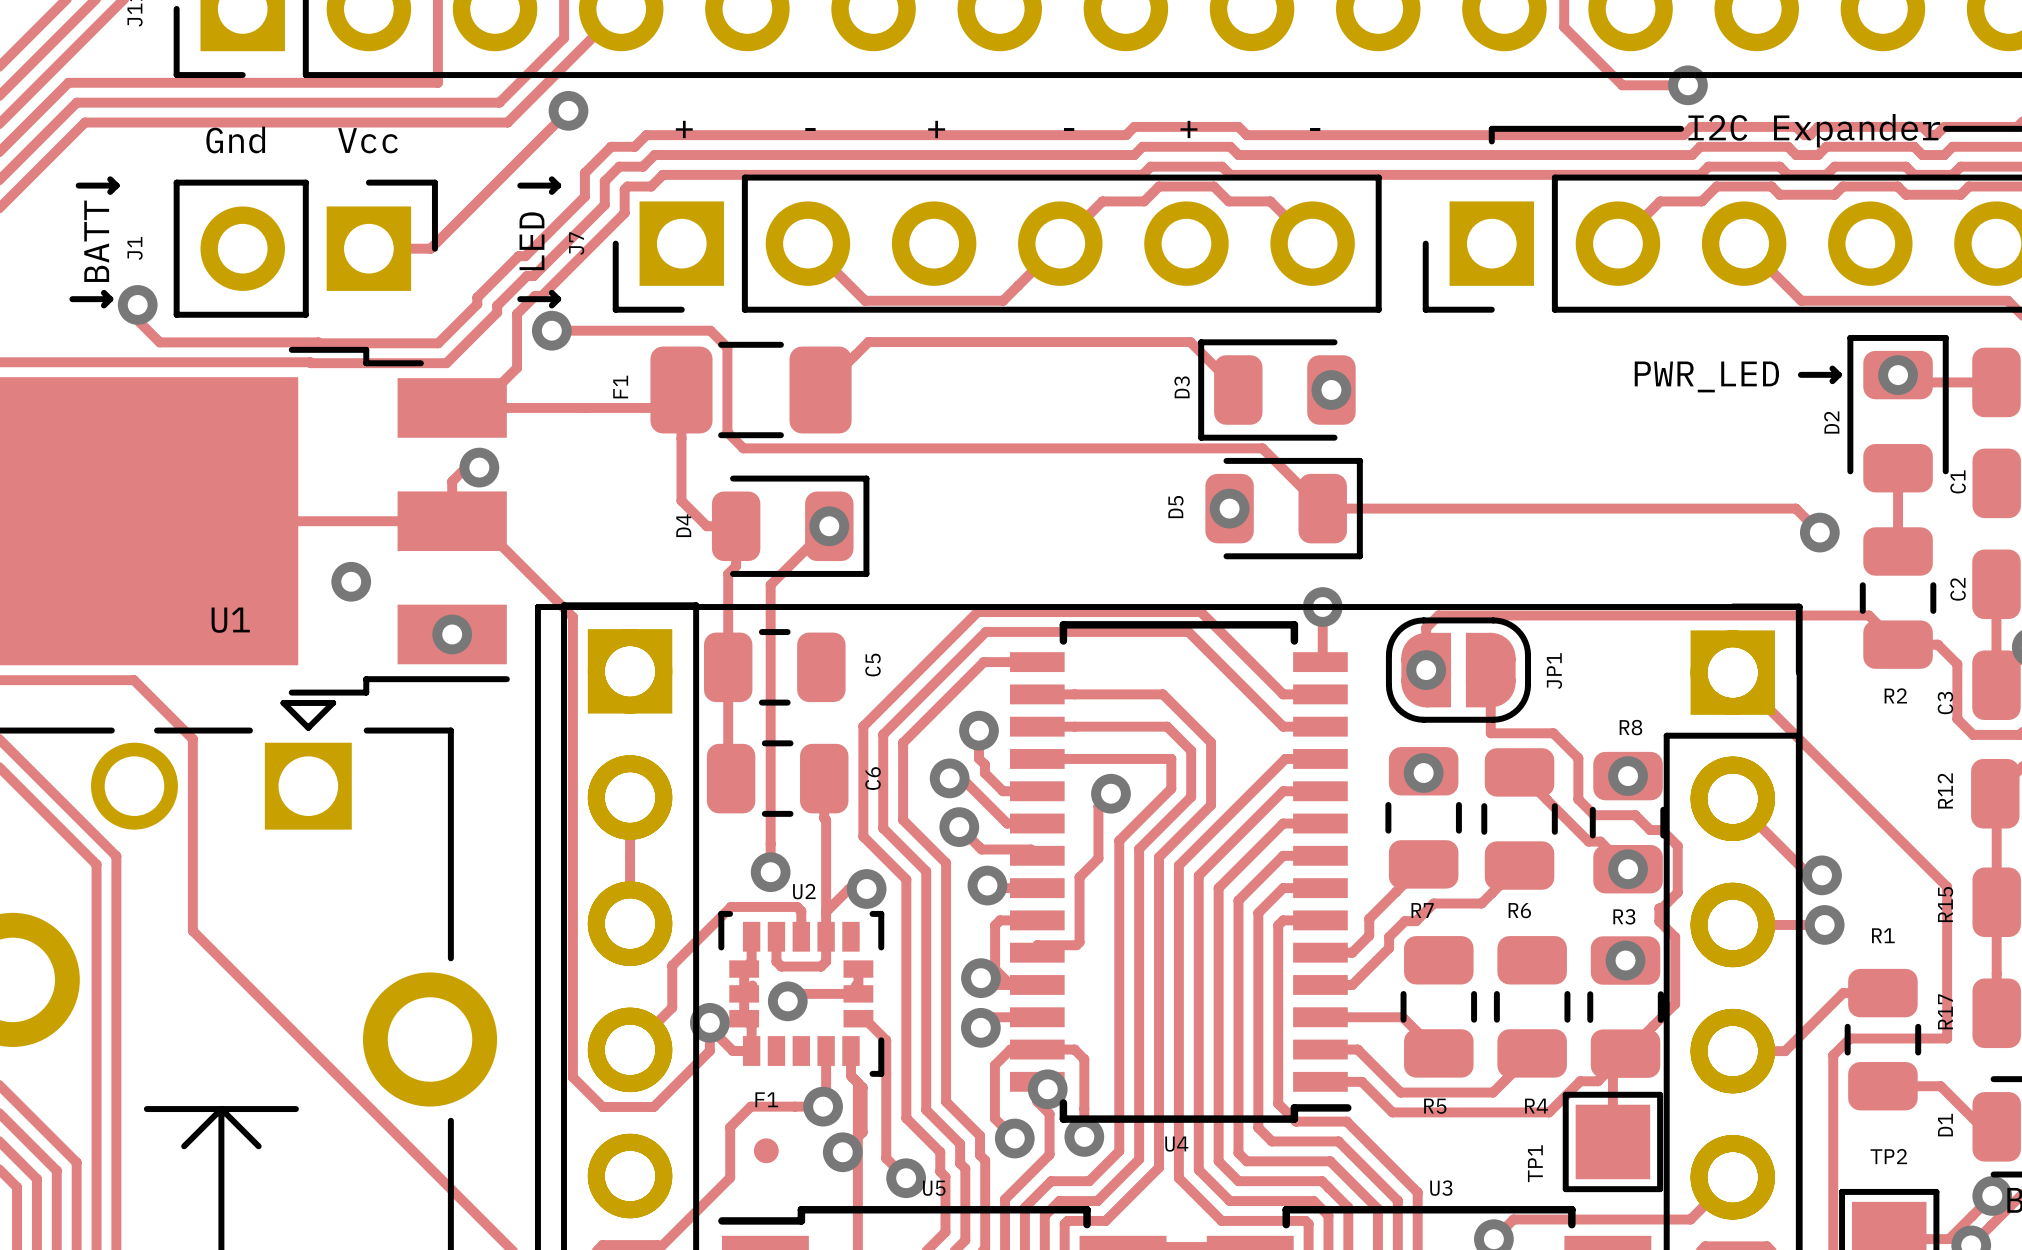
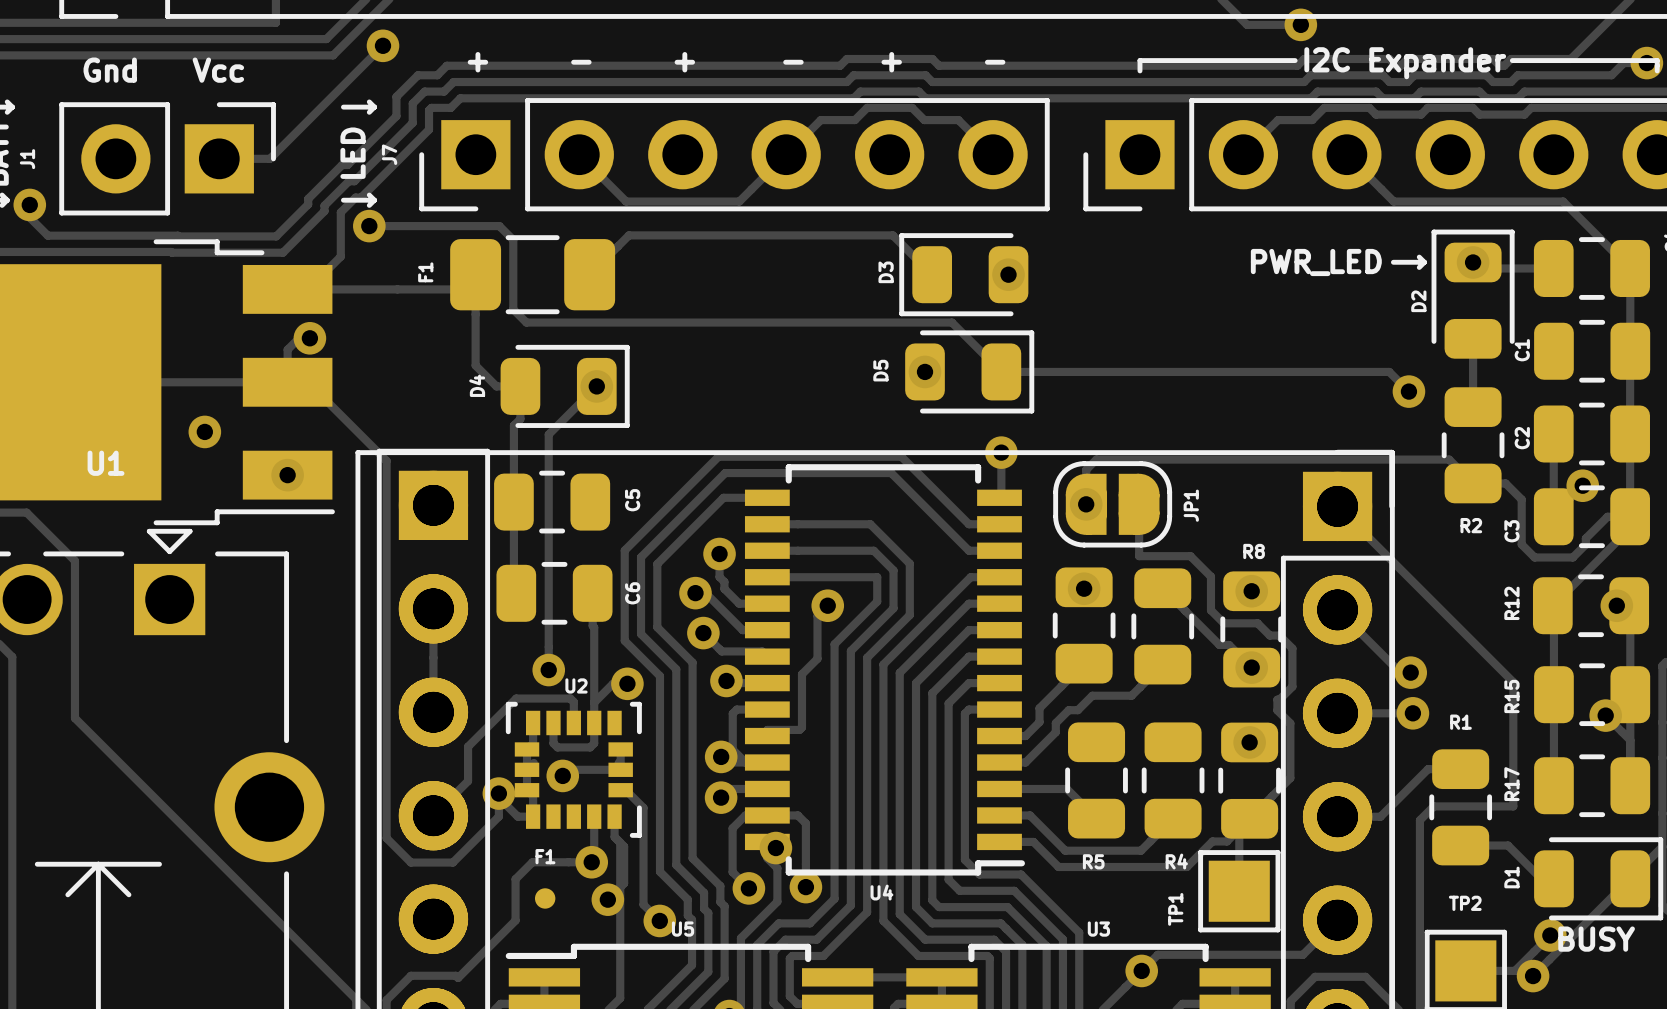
R7 name: R7 (1422, 910) -> none
R6 name: R6 (1519, 910) -> none
R3 name: R3 (1624, 916) -> none

